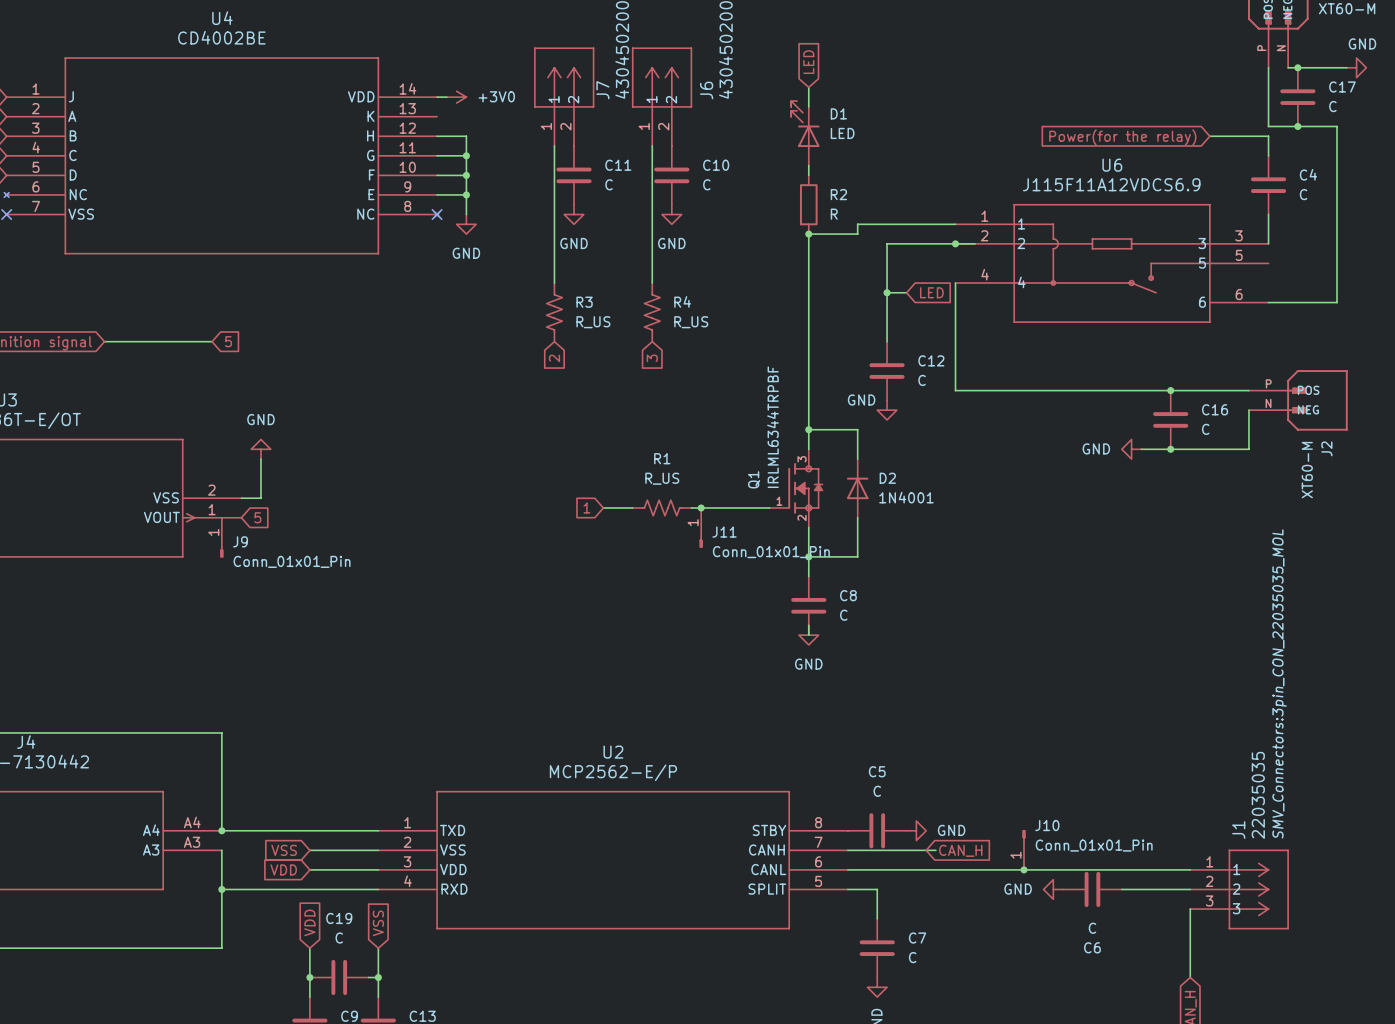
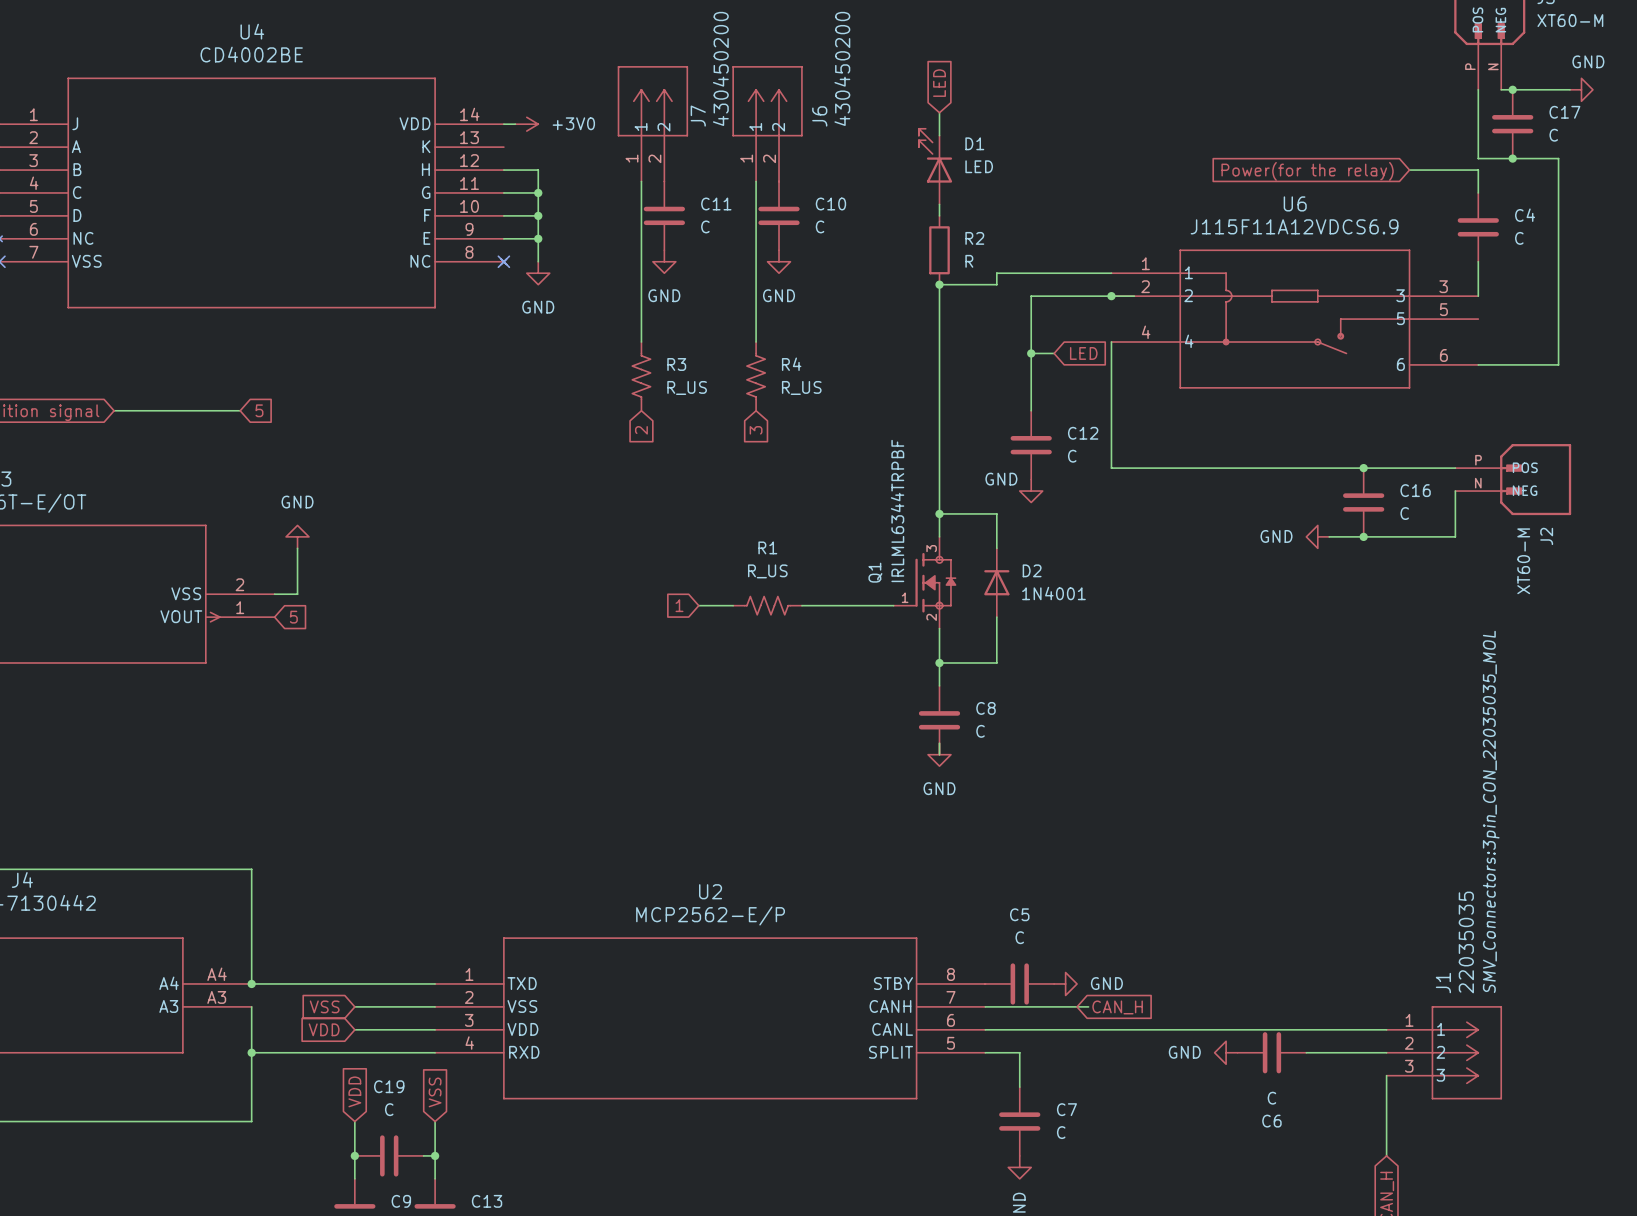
junction: (701, 507) -> none
J11: Conn_01x01_Pin (701, 527) -> none
J9: Conn_01x01_Pin (221, 537) -> none
J10: Conn_01x01_Pin (1023, 850) -> none
junction: (1023, 869) -> none

